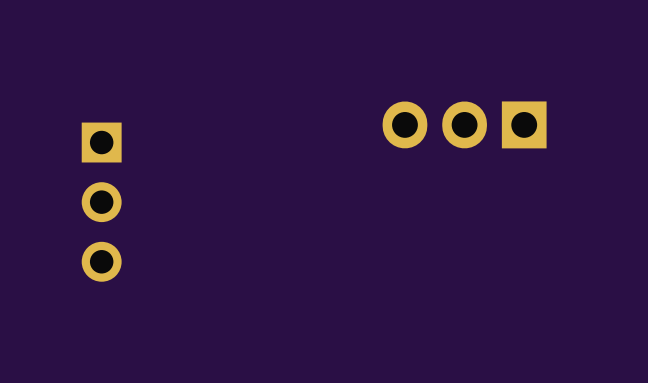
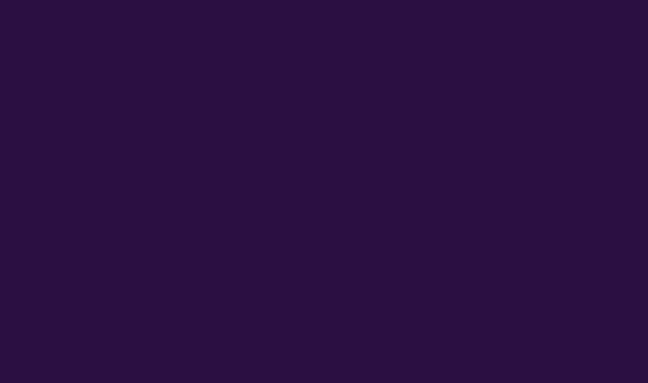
part: (464, 124) -> none
part: (101, 202) -> none

